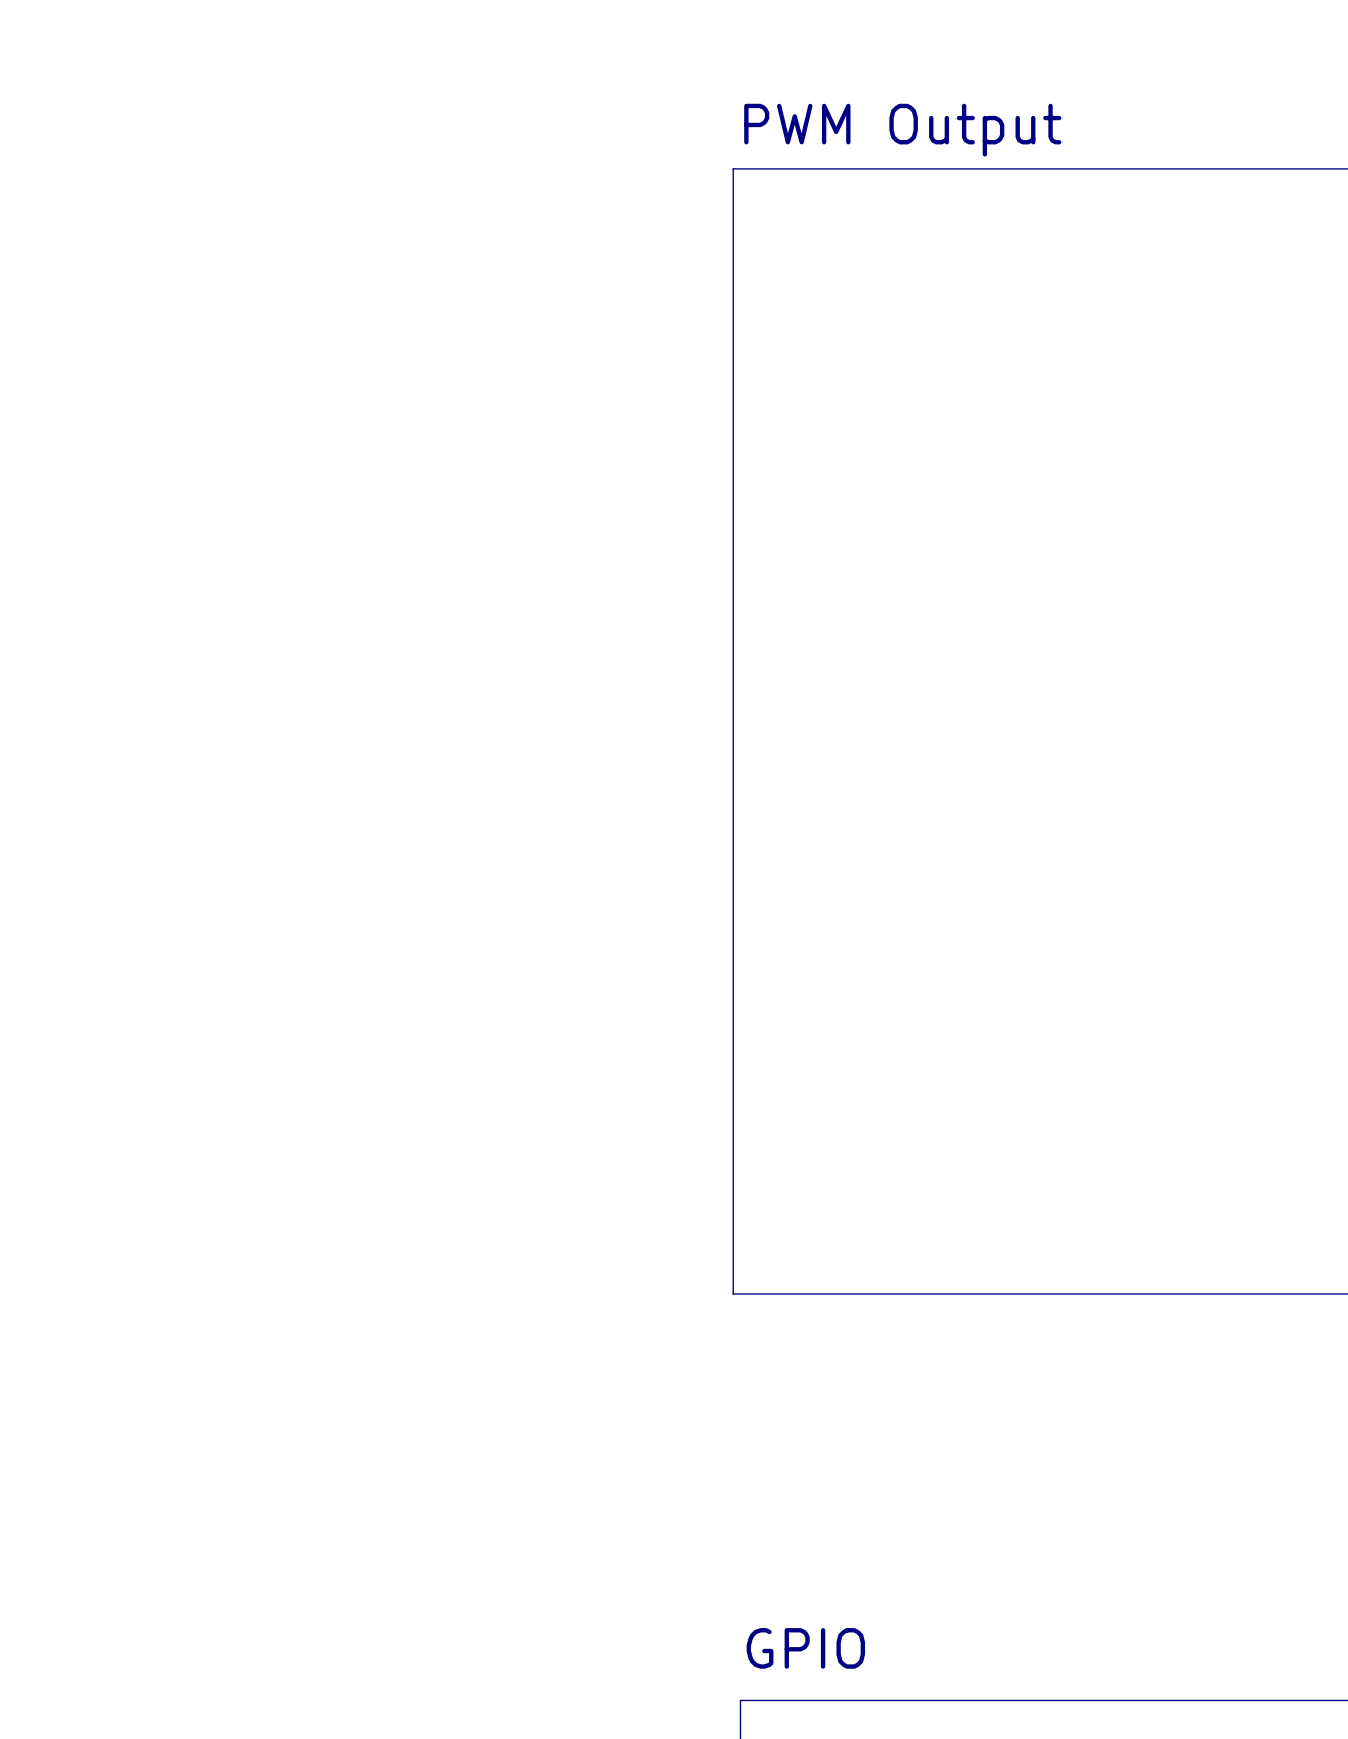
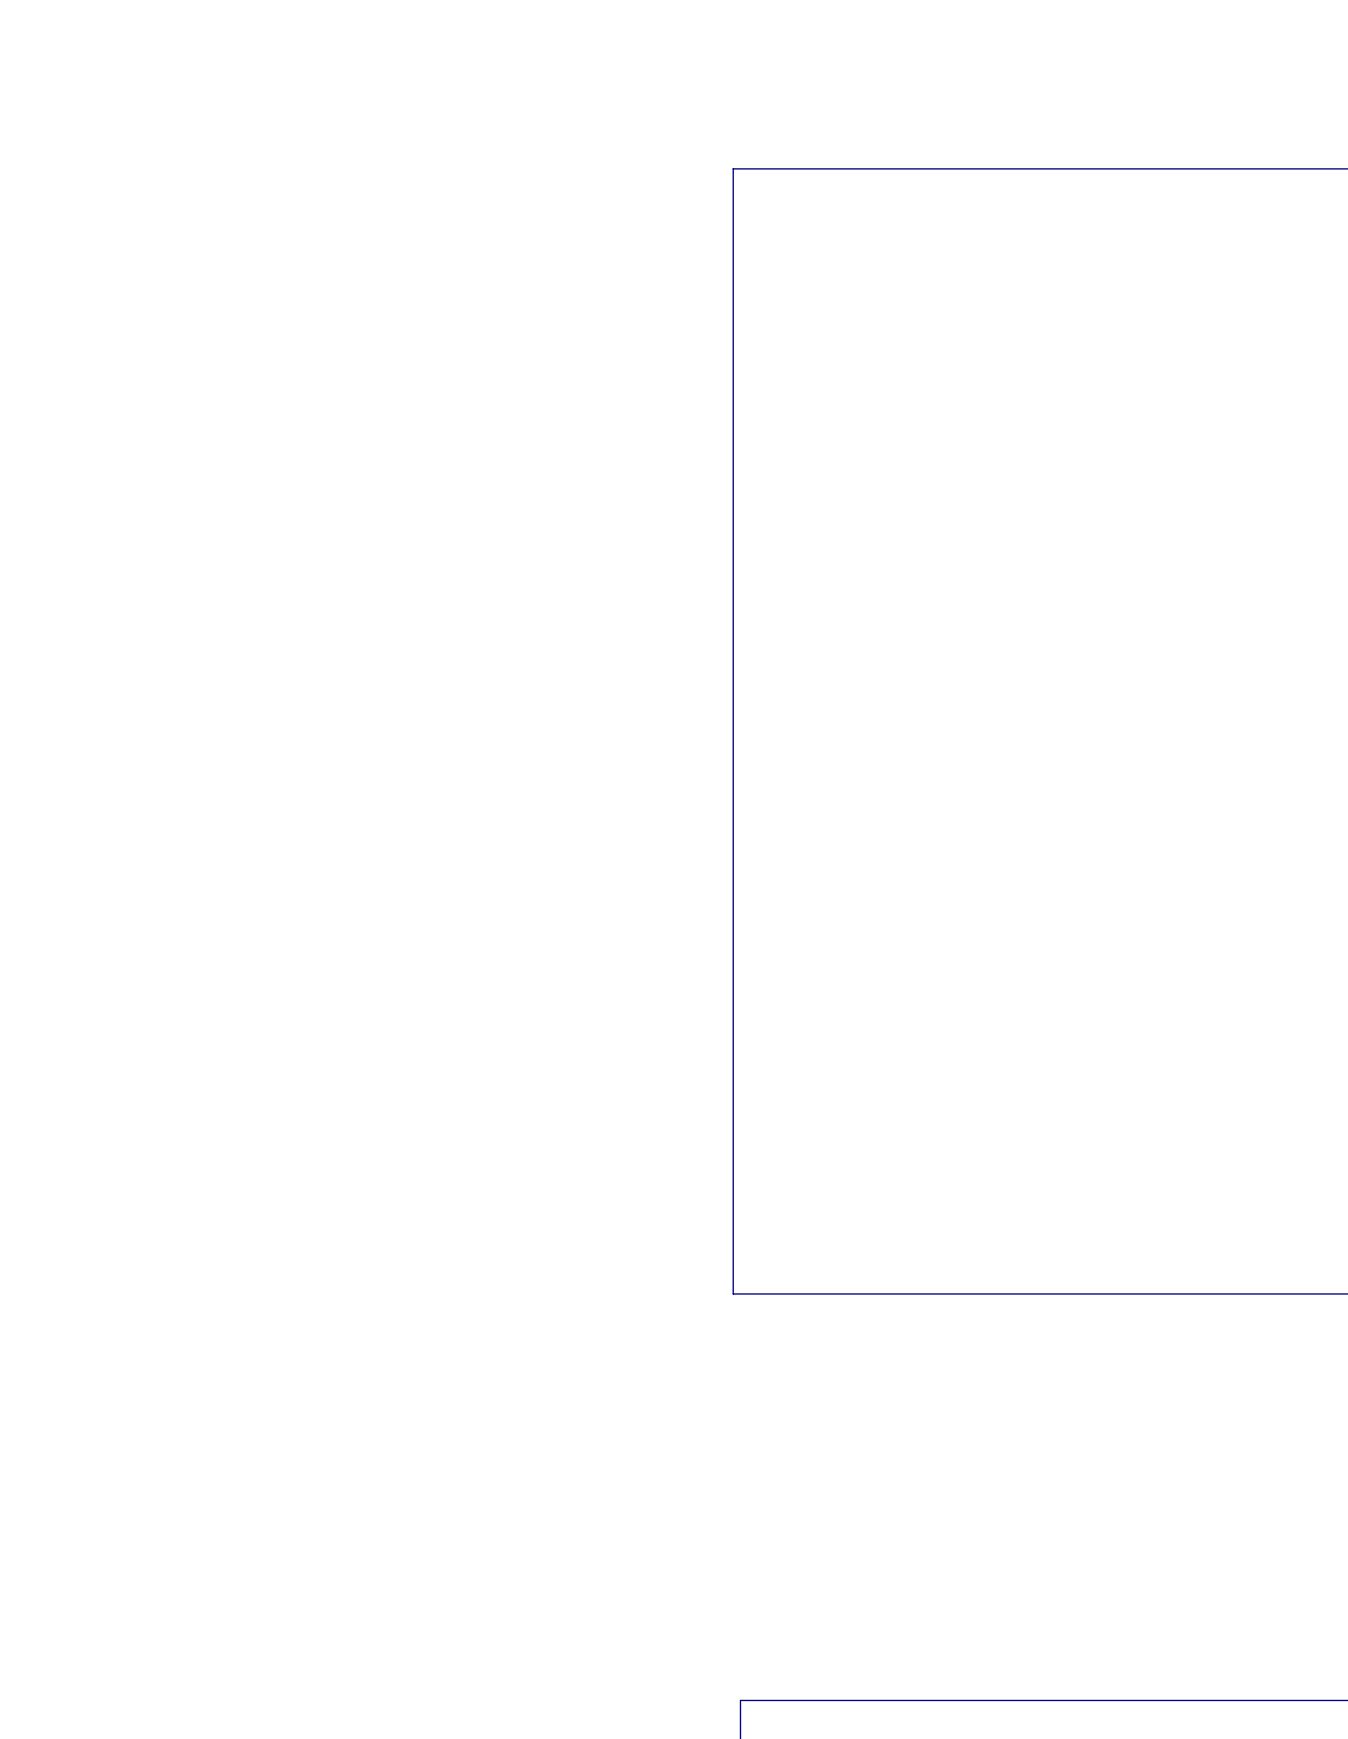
text: PWM Output (902, 130) -> none
text: GPIO (805, 1648) -> none

